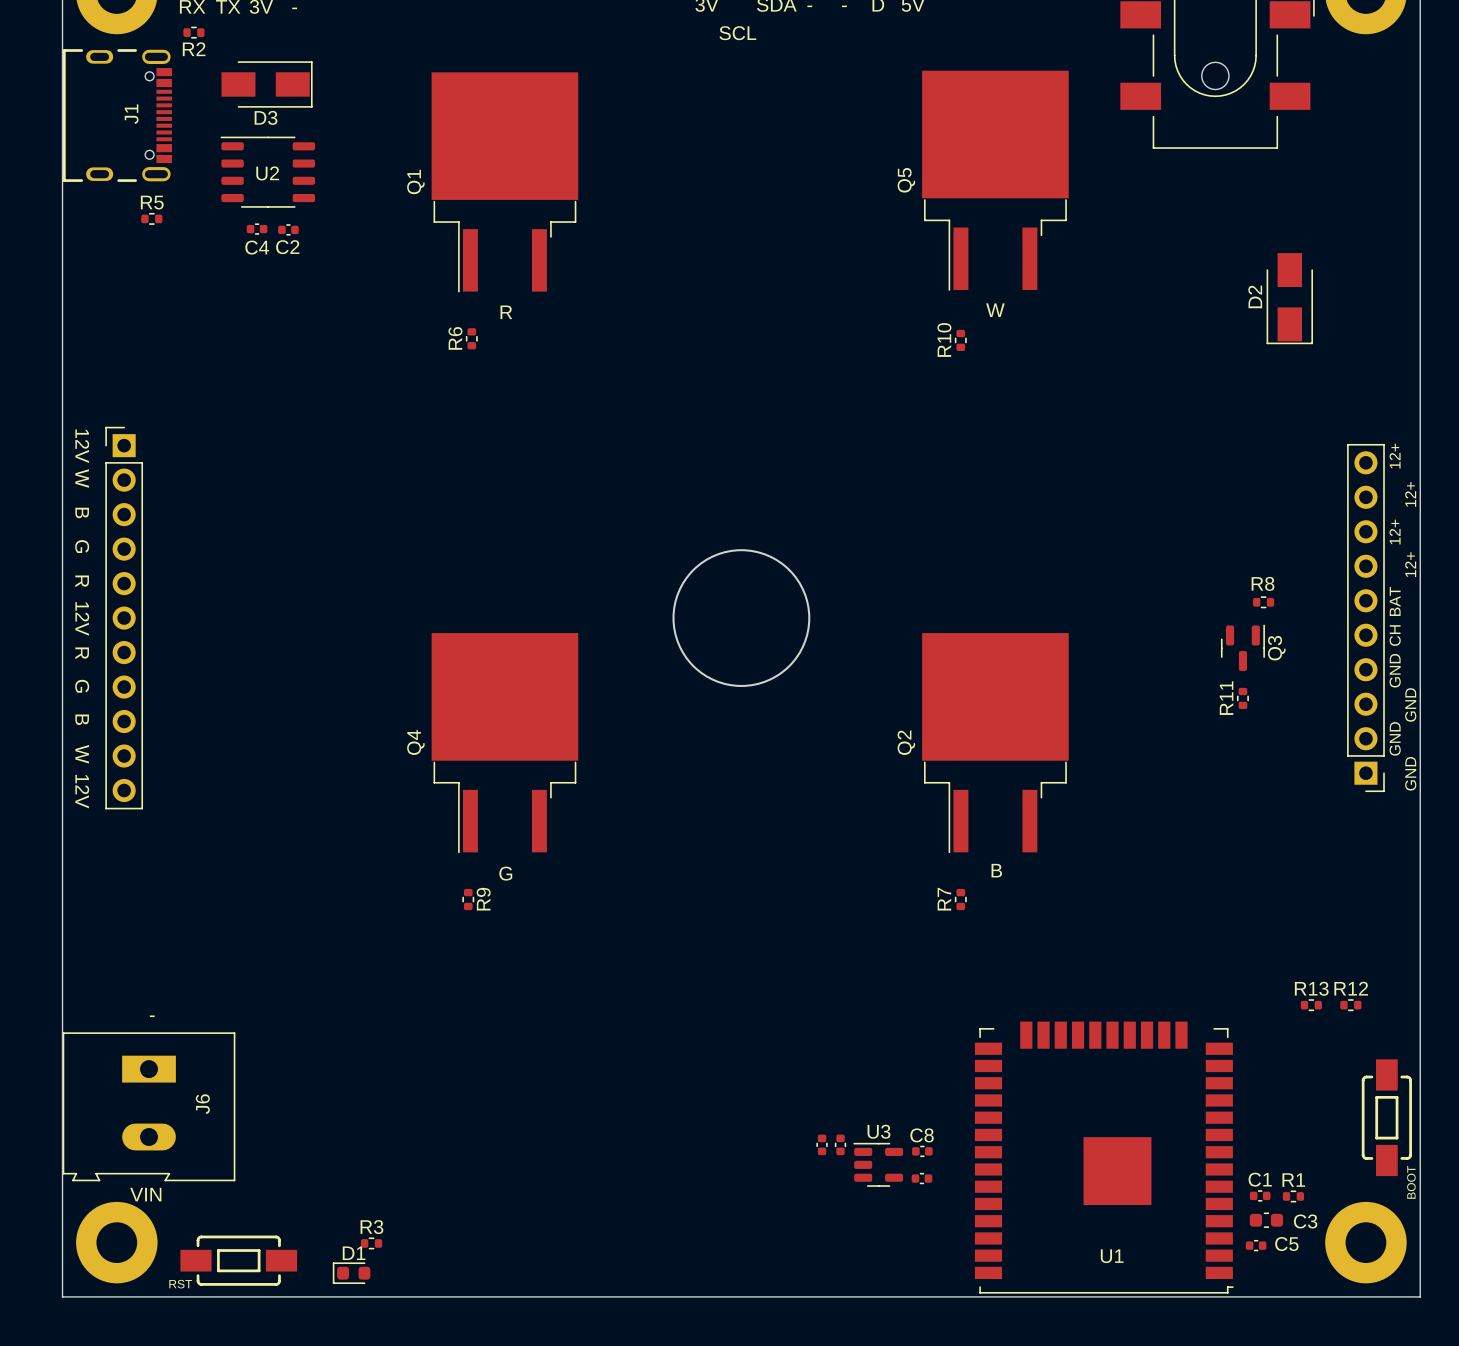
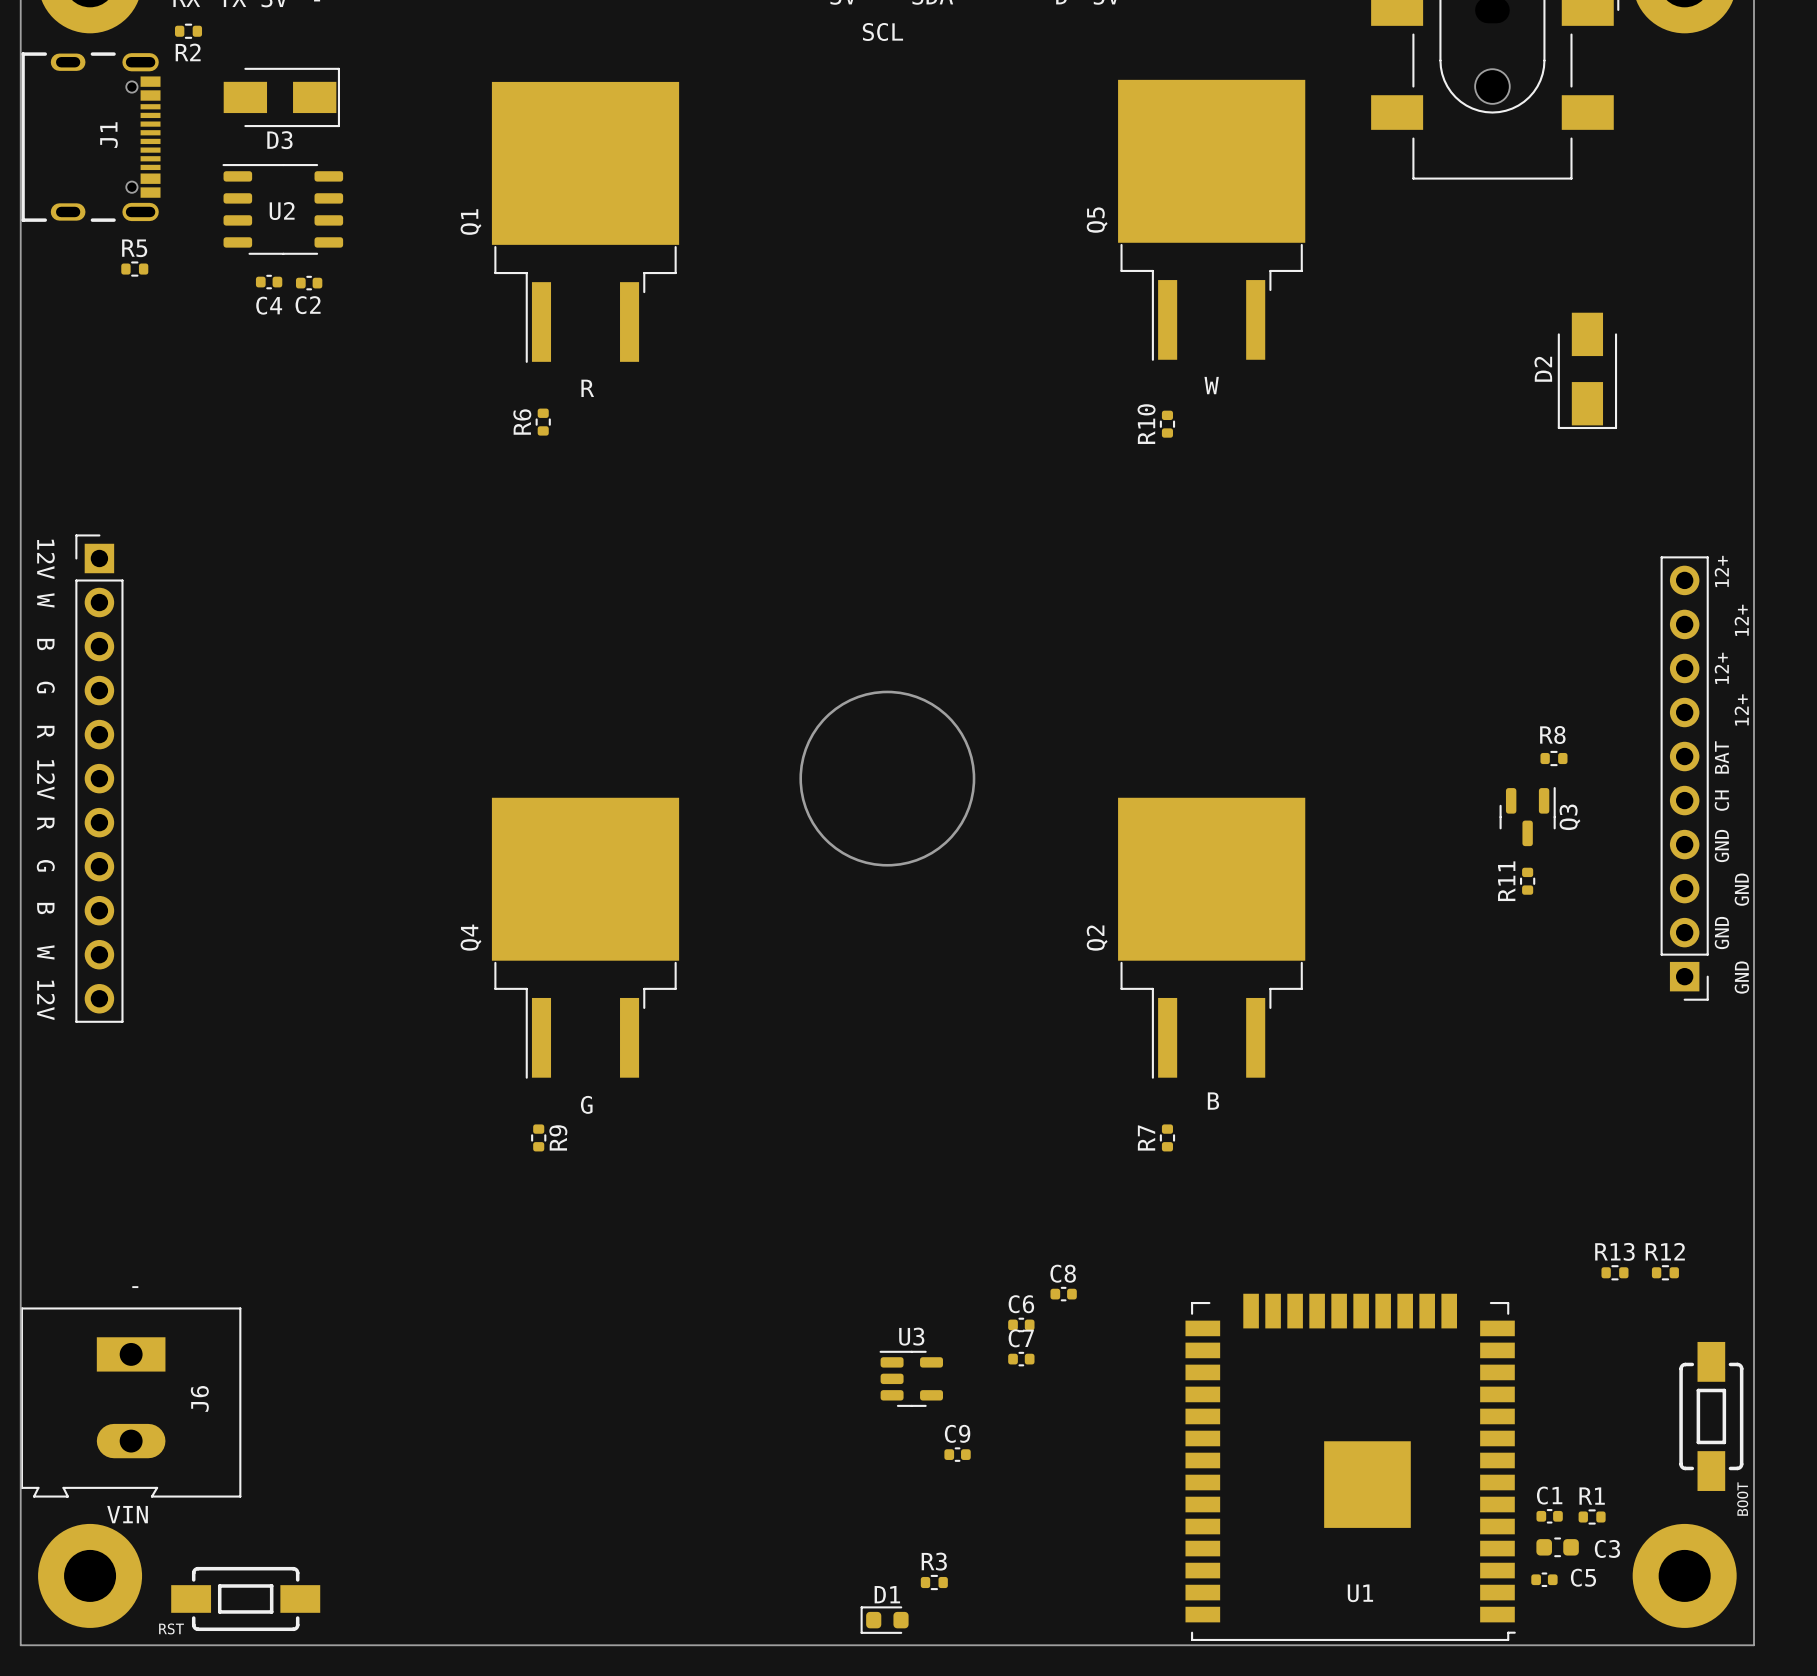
C6: none -> (1021, 1324)
C7: none -> (1021, 1359)
part: (822, 1144) -> none
part: (840, 1144) -> none
C9: none -> (957, 1454)
C8 position: (922, 1151) -> (1063, 1294)
U3 position: (878, 1164) -> (911, 1378)
part: (921, 1178) -> none
R3 position: (371, 1243) -> (934, 1582)
D1 position: (351, 1273) -> (884, 1620)

